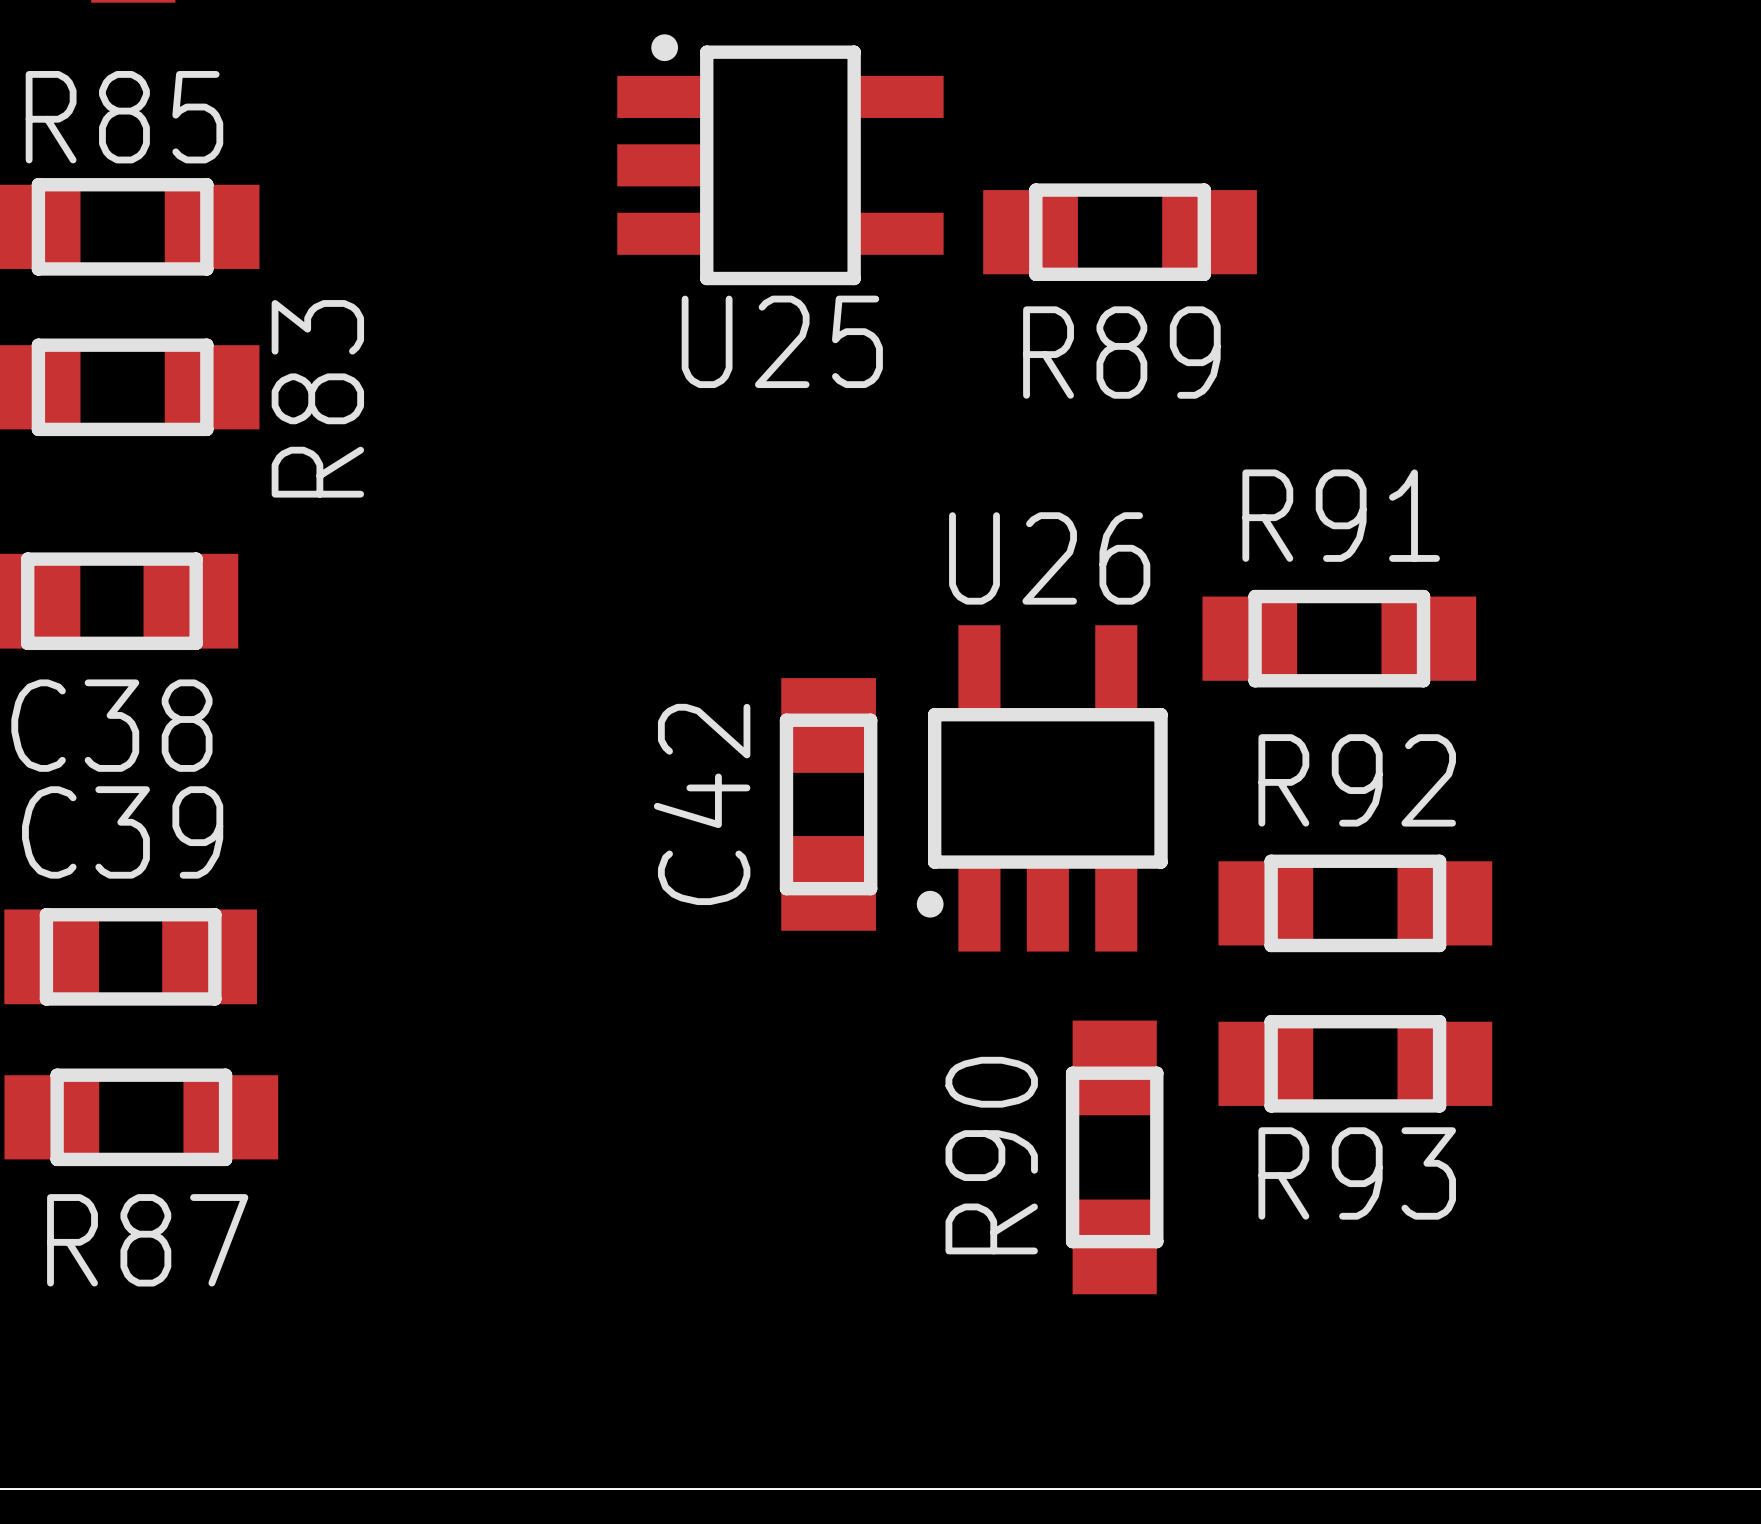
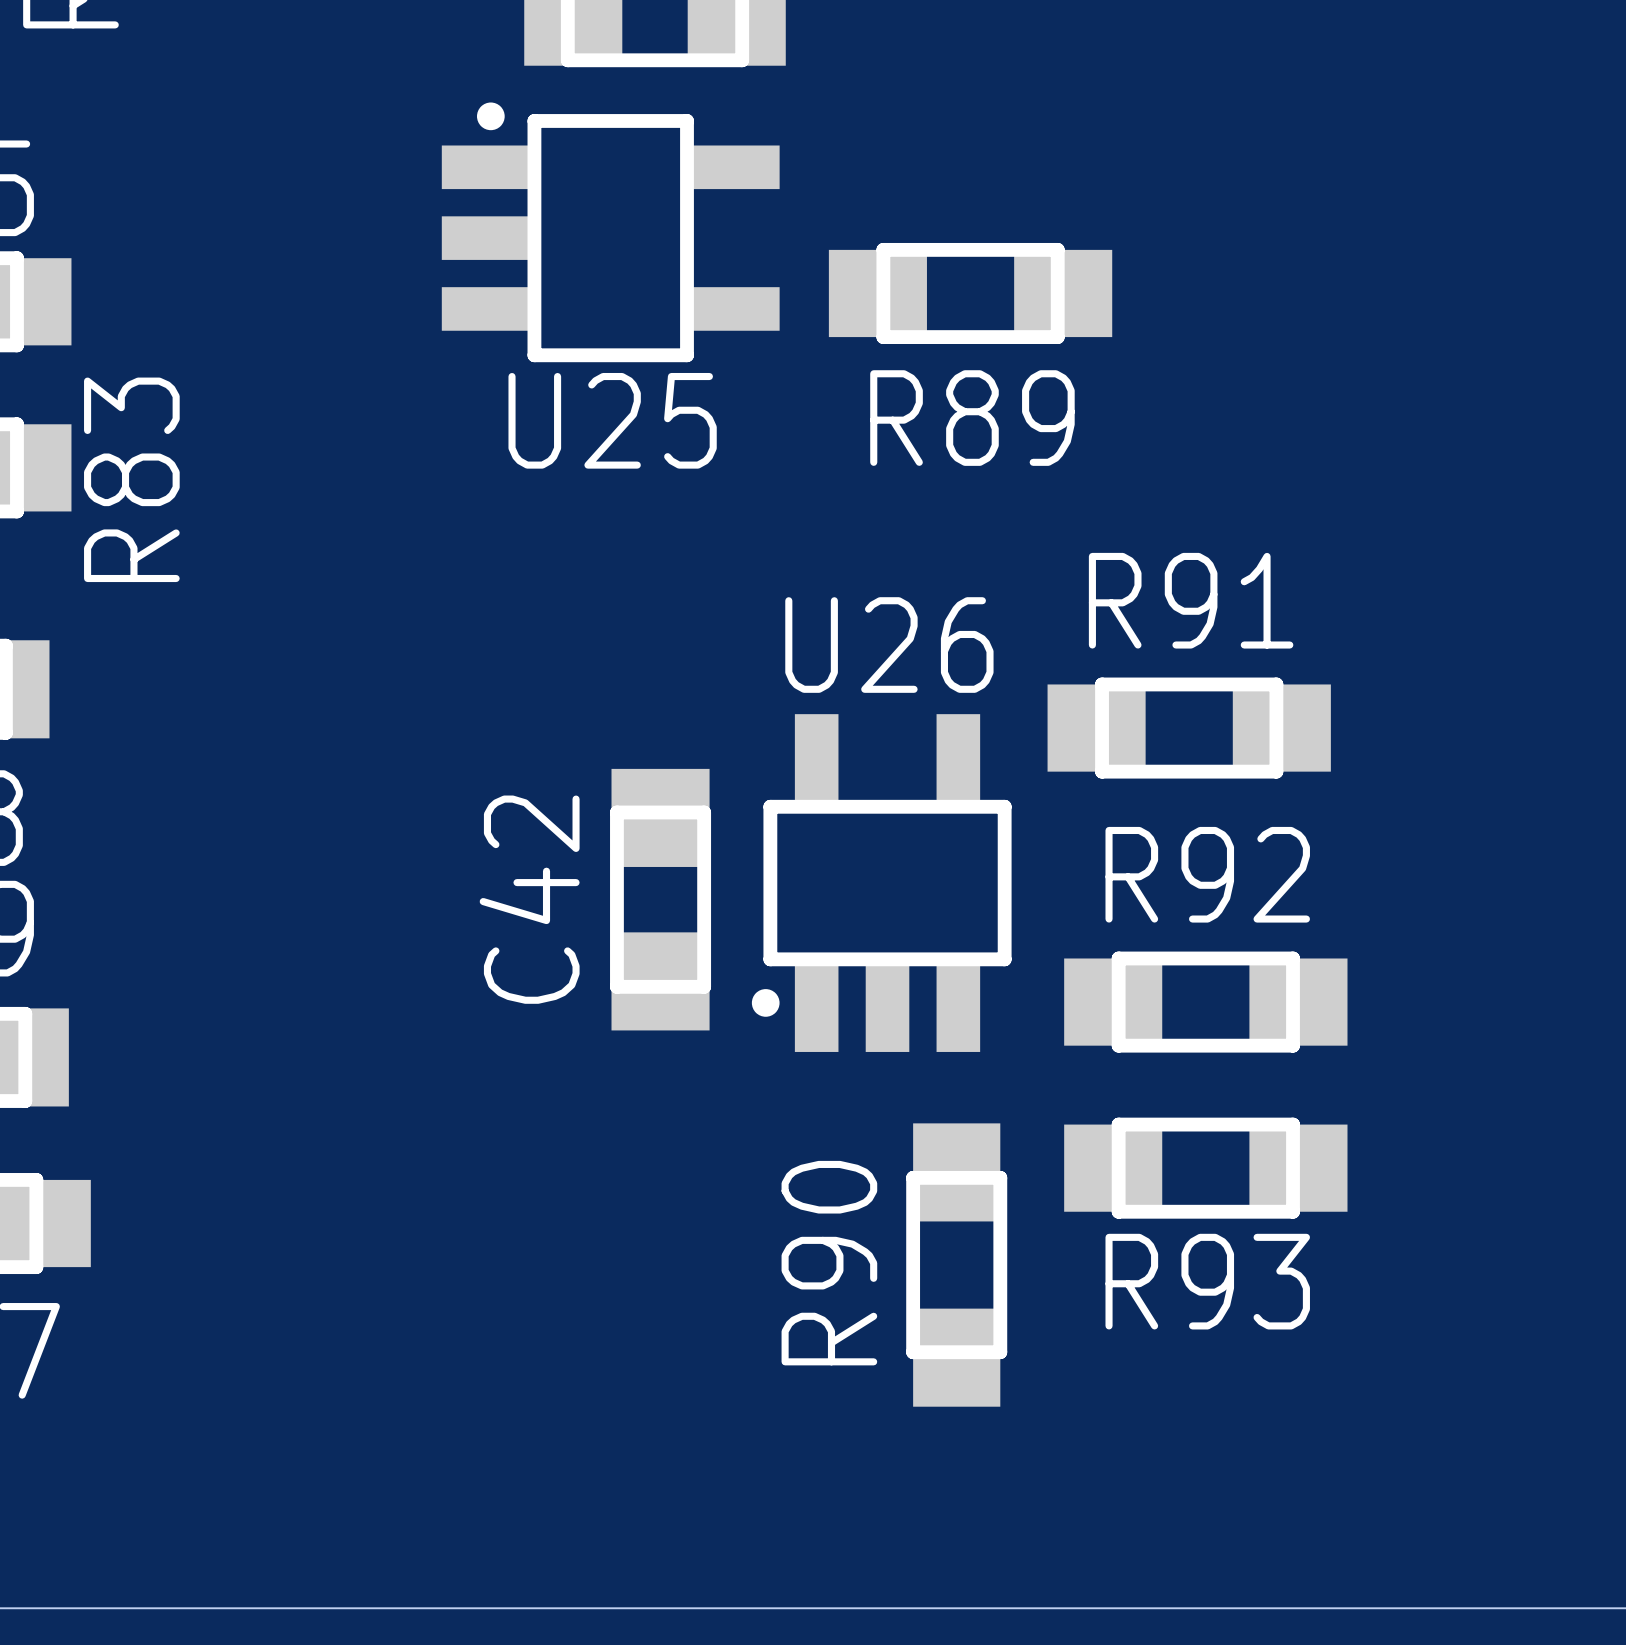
R89 position: (1120, 232) -> (970, 293)

